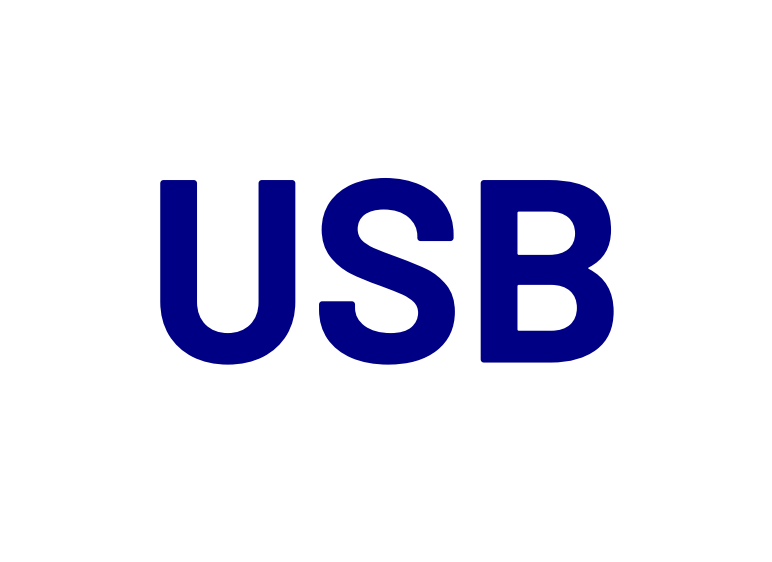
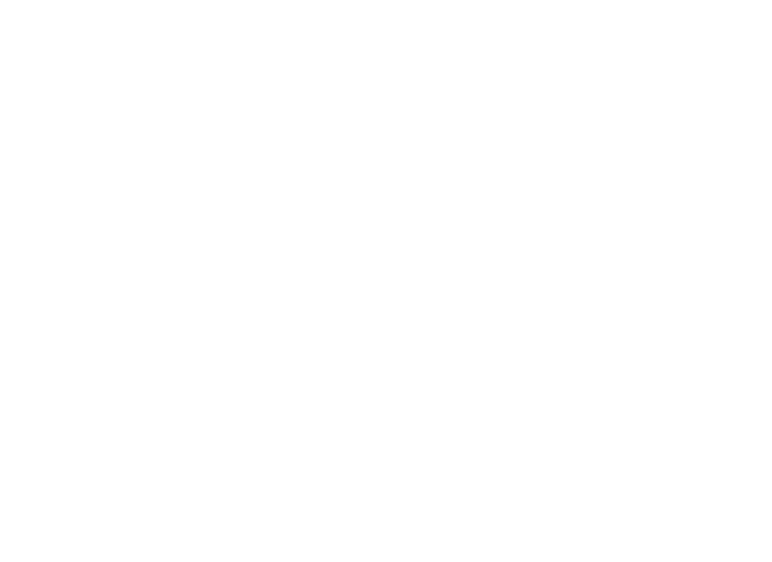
text: USB (386, 271) -> none

